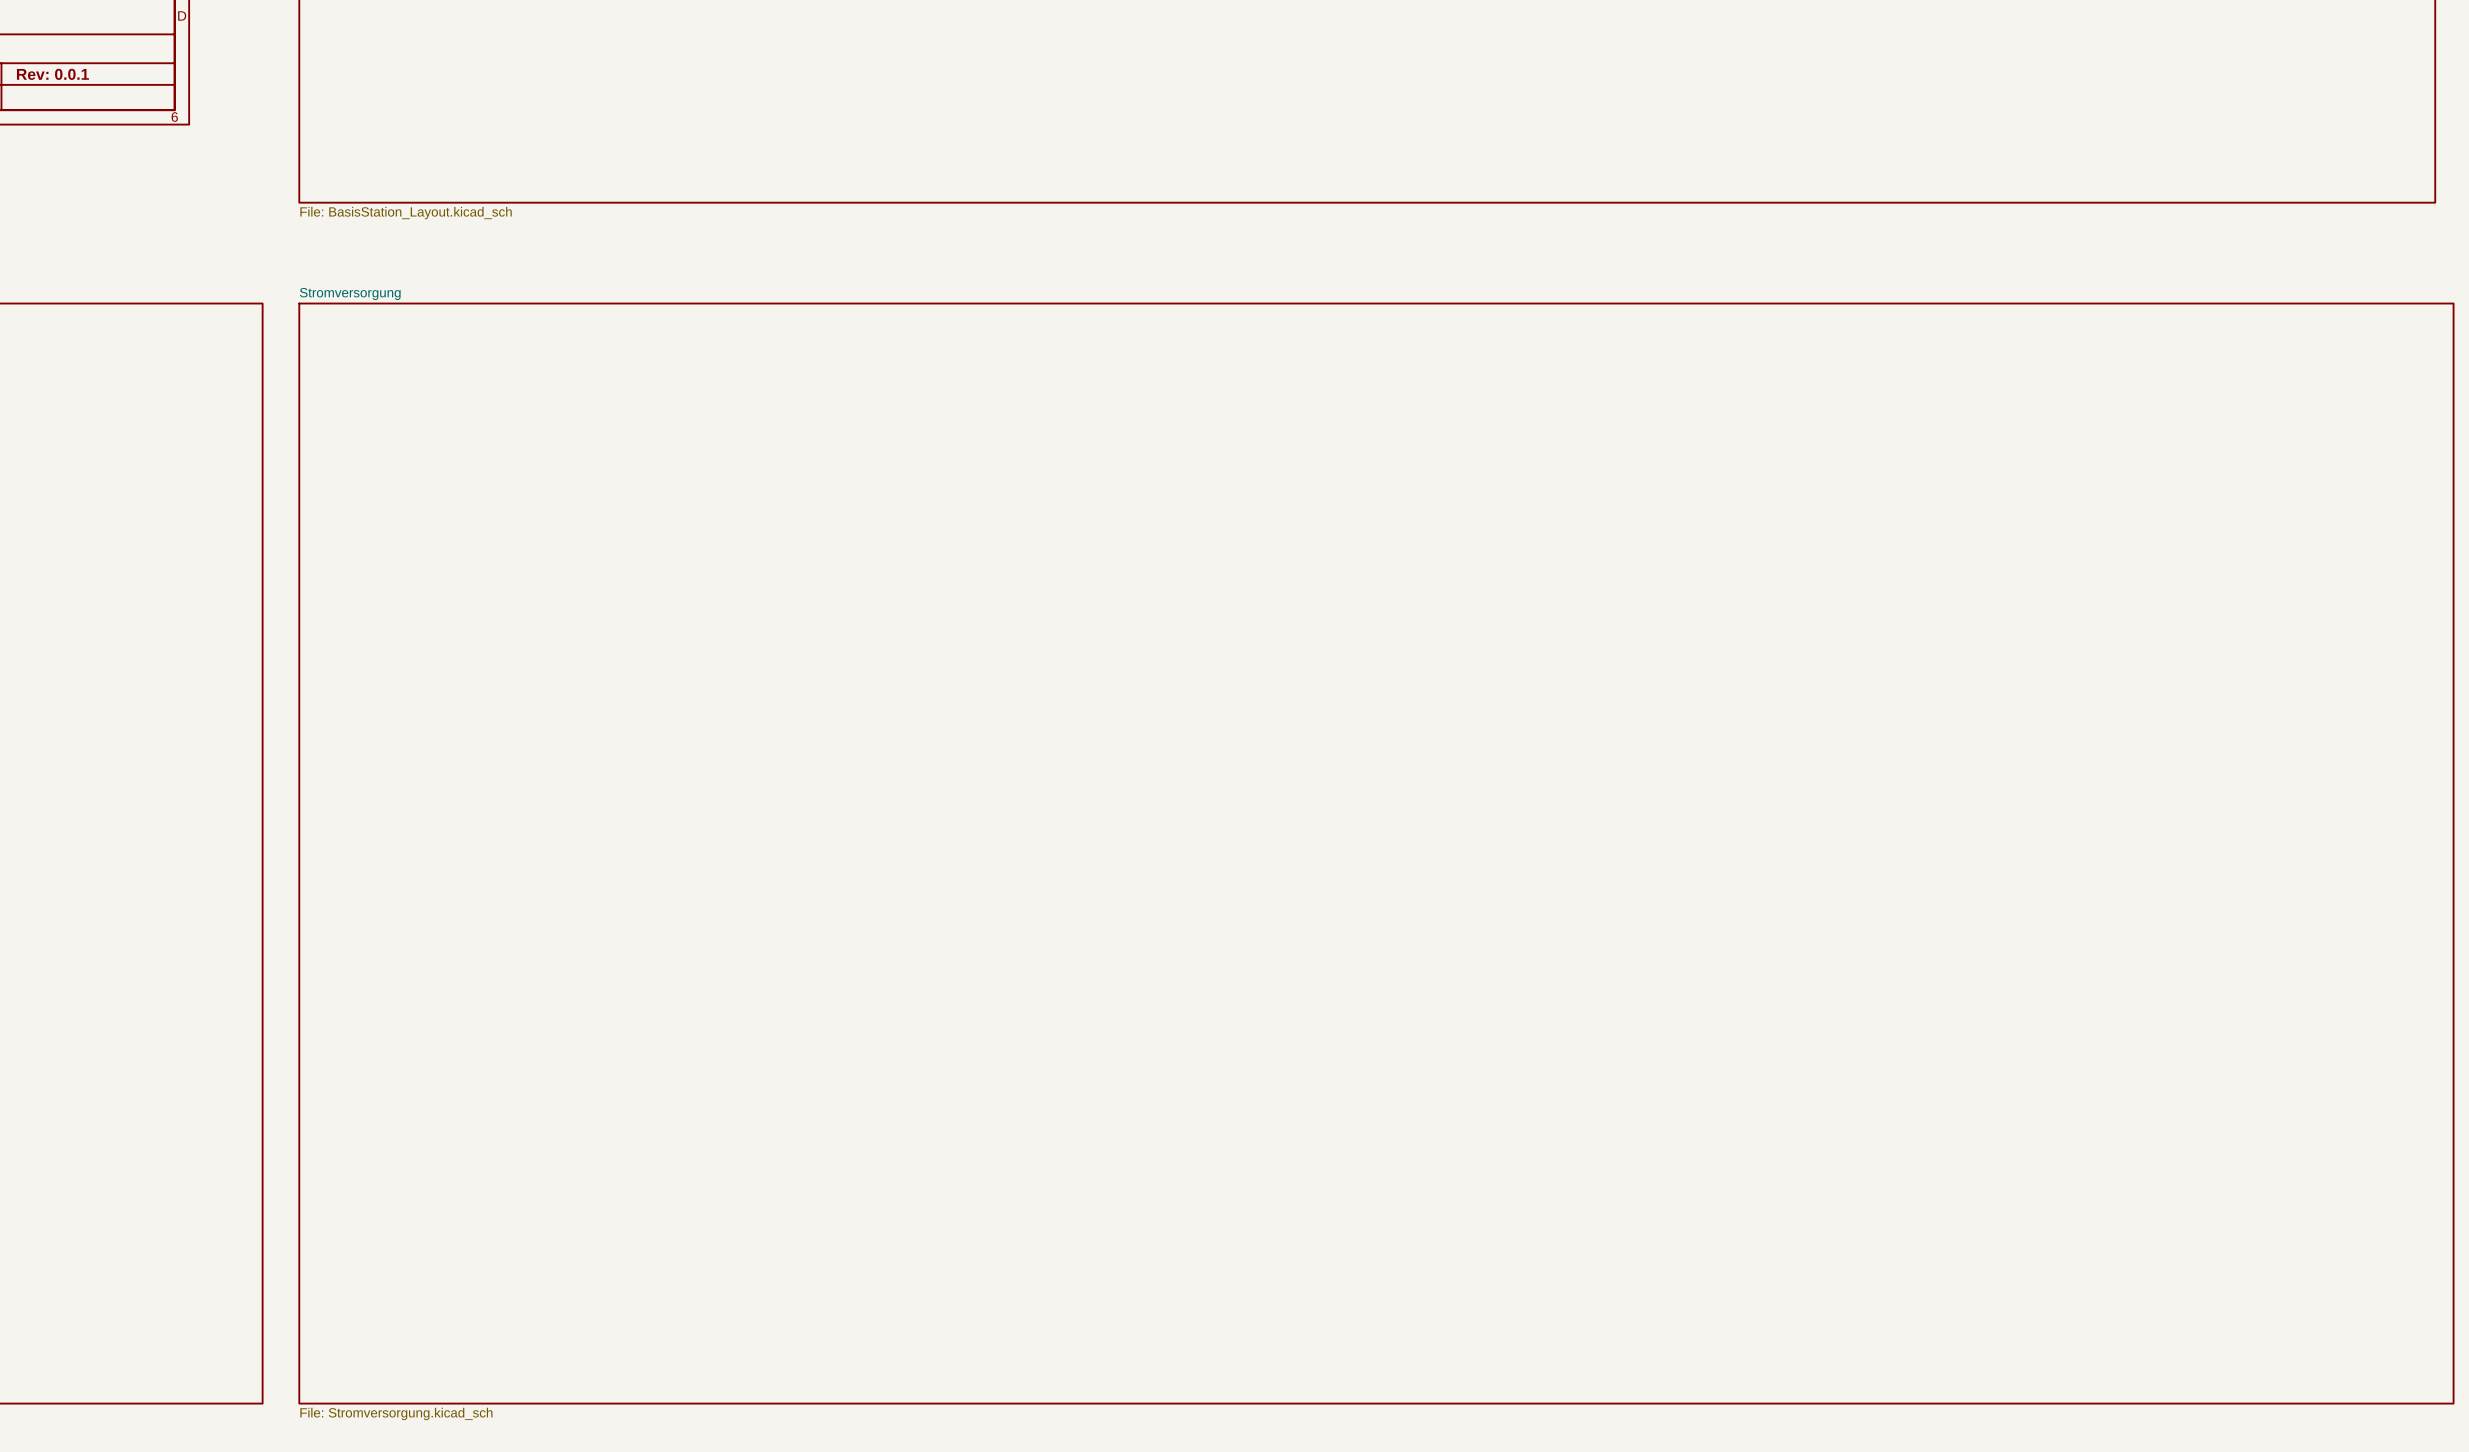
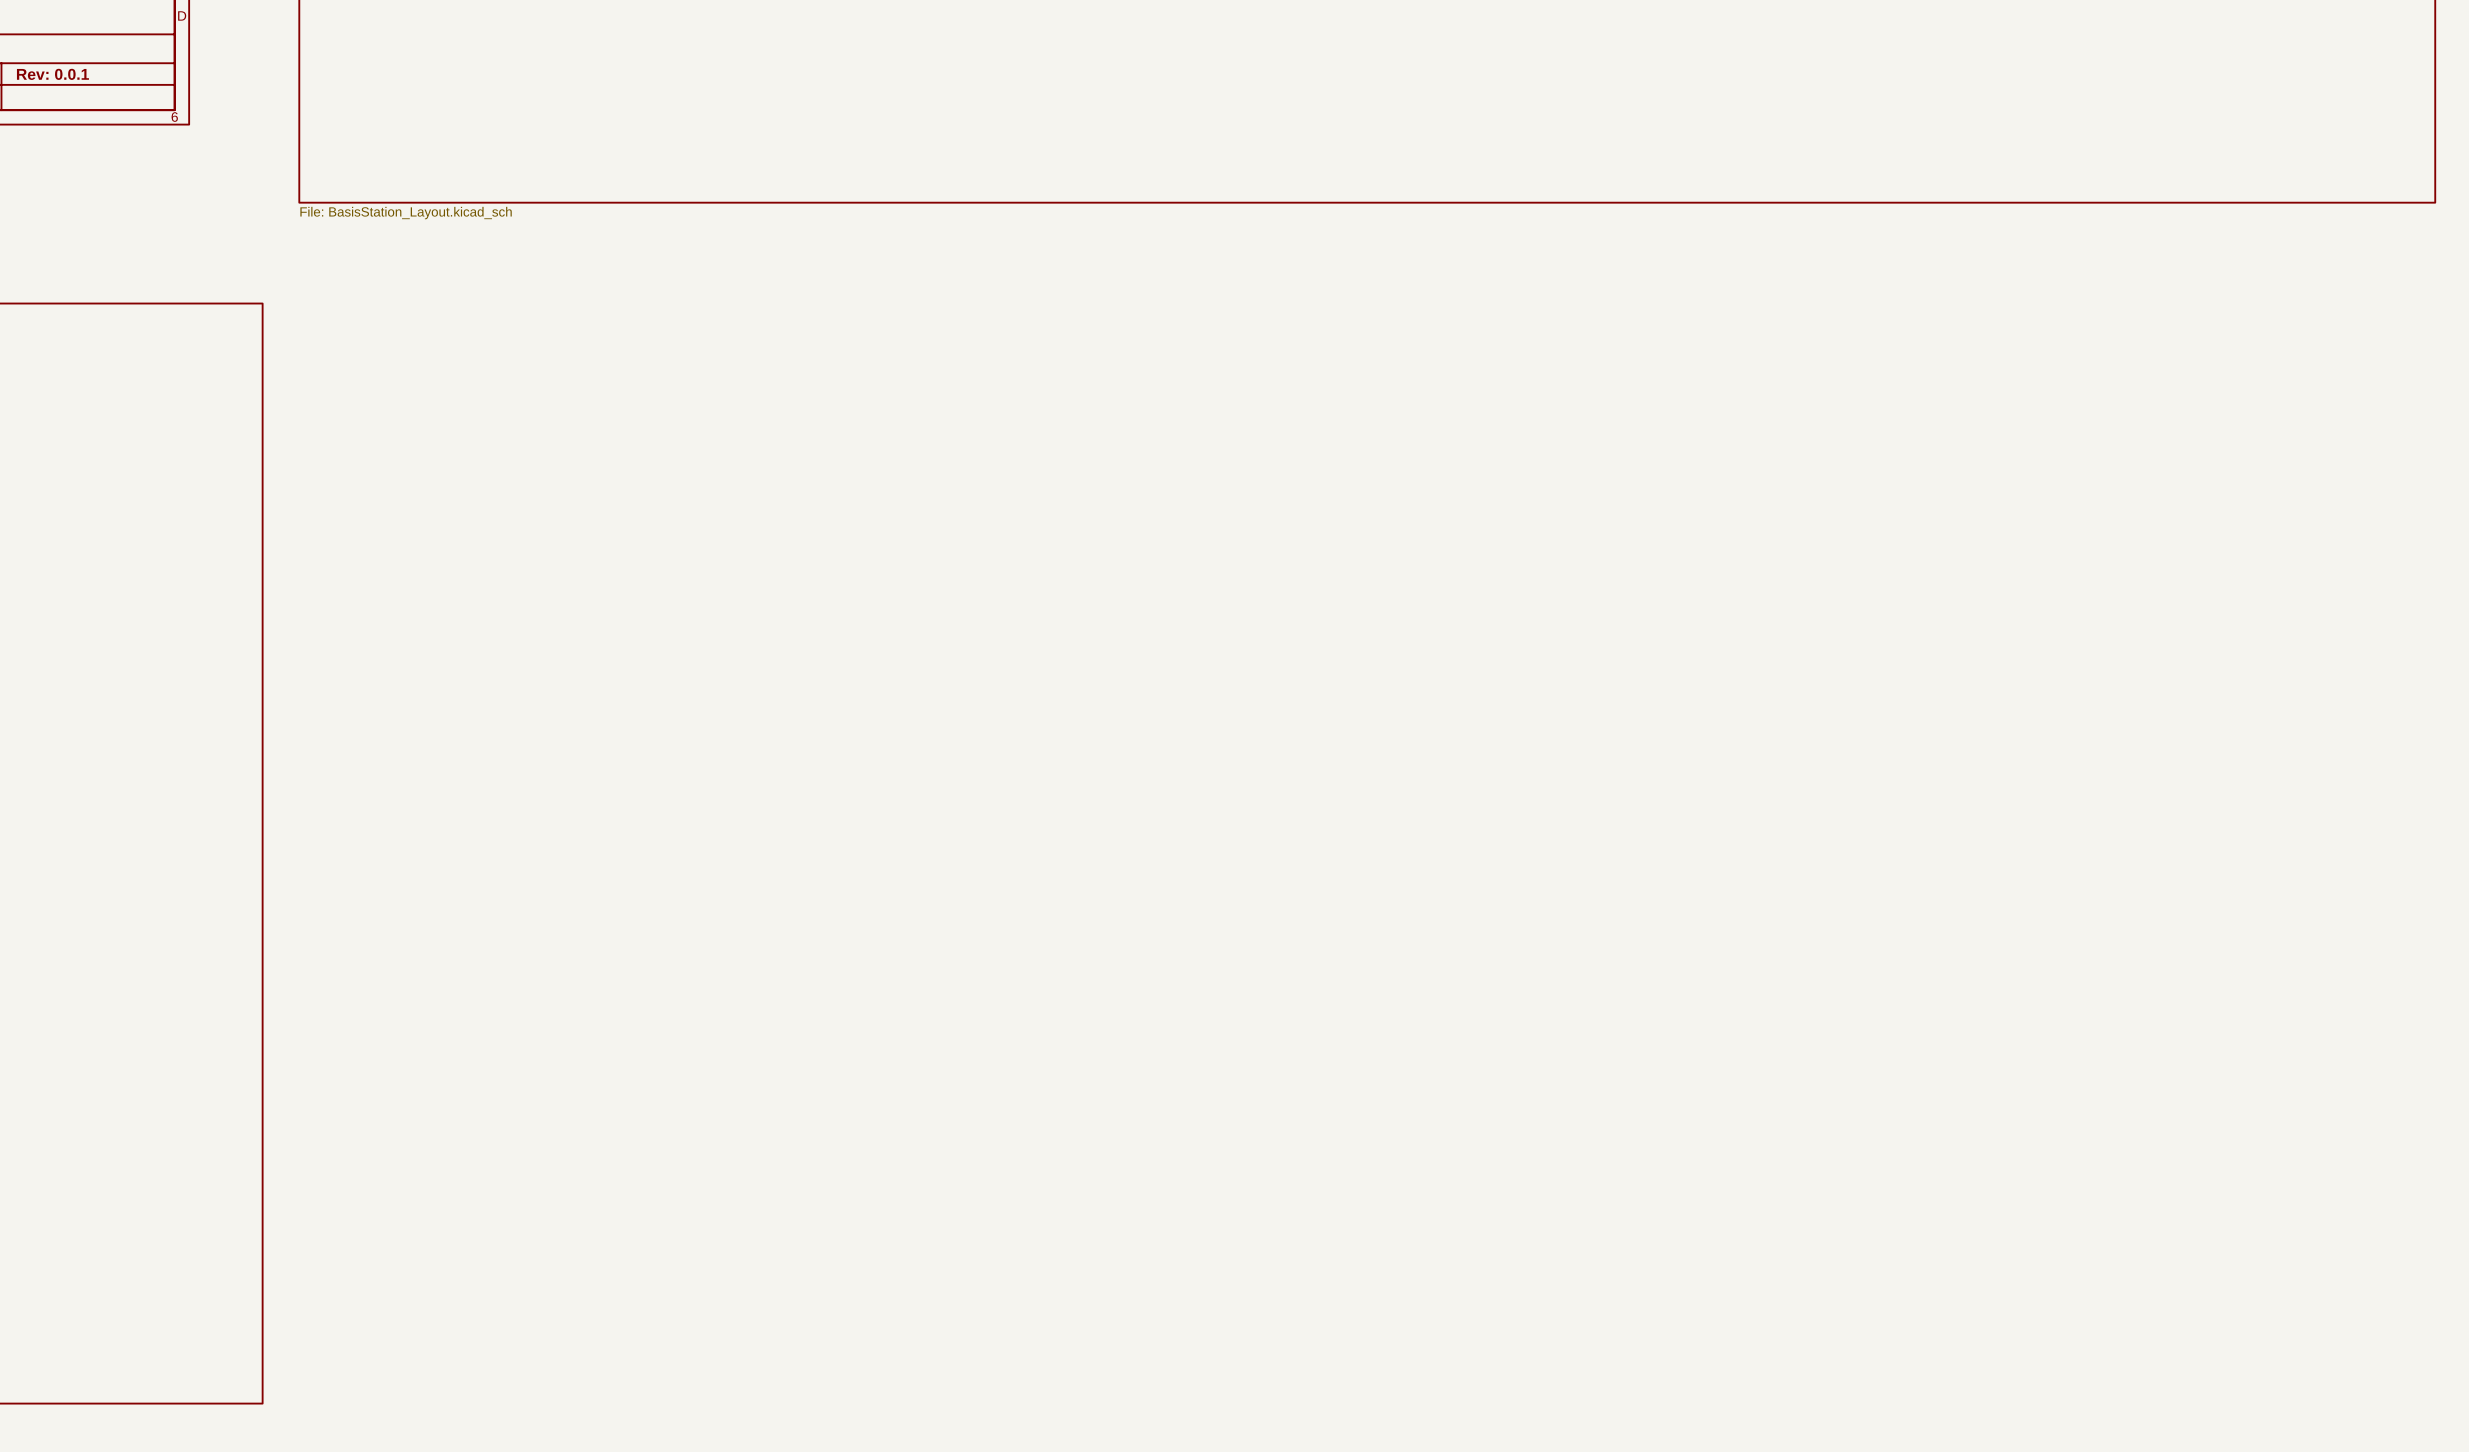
sheet Stromversorgung: File: Stromversorgung.kicad_sch (1376, 853) -> none

